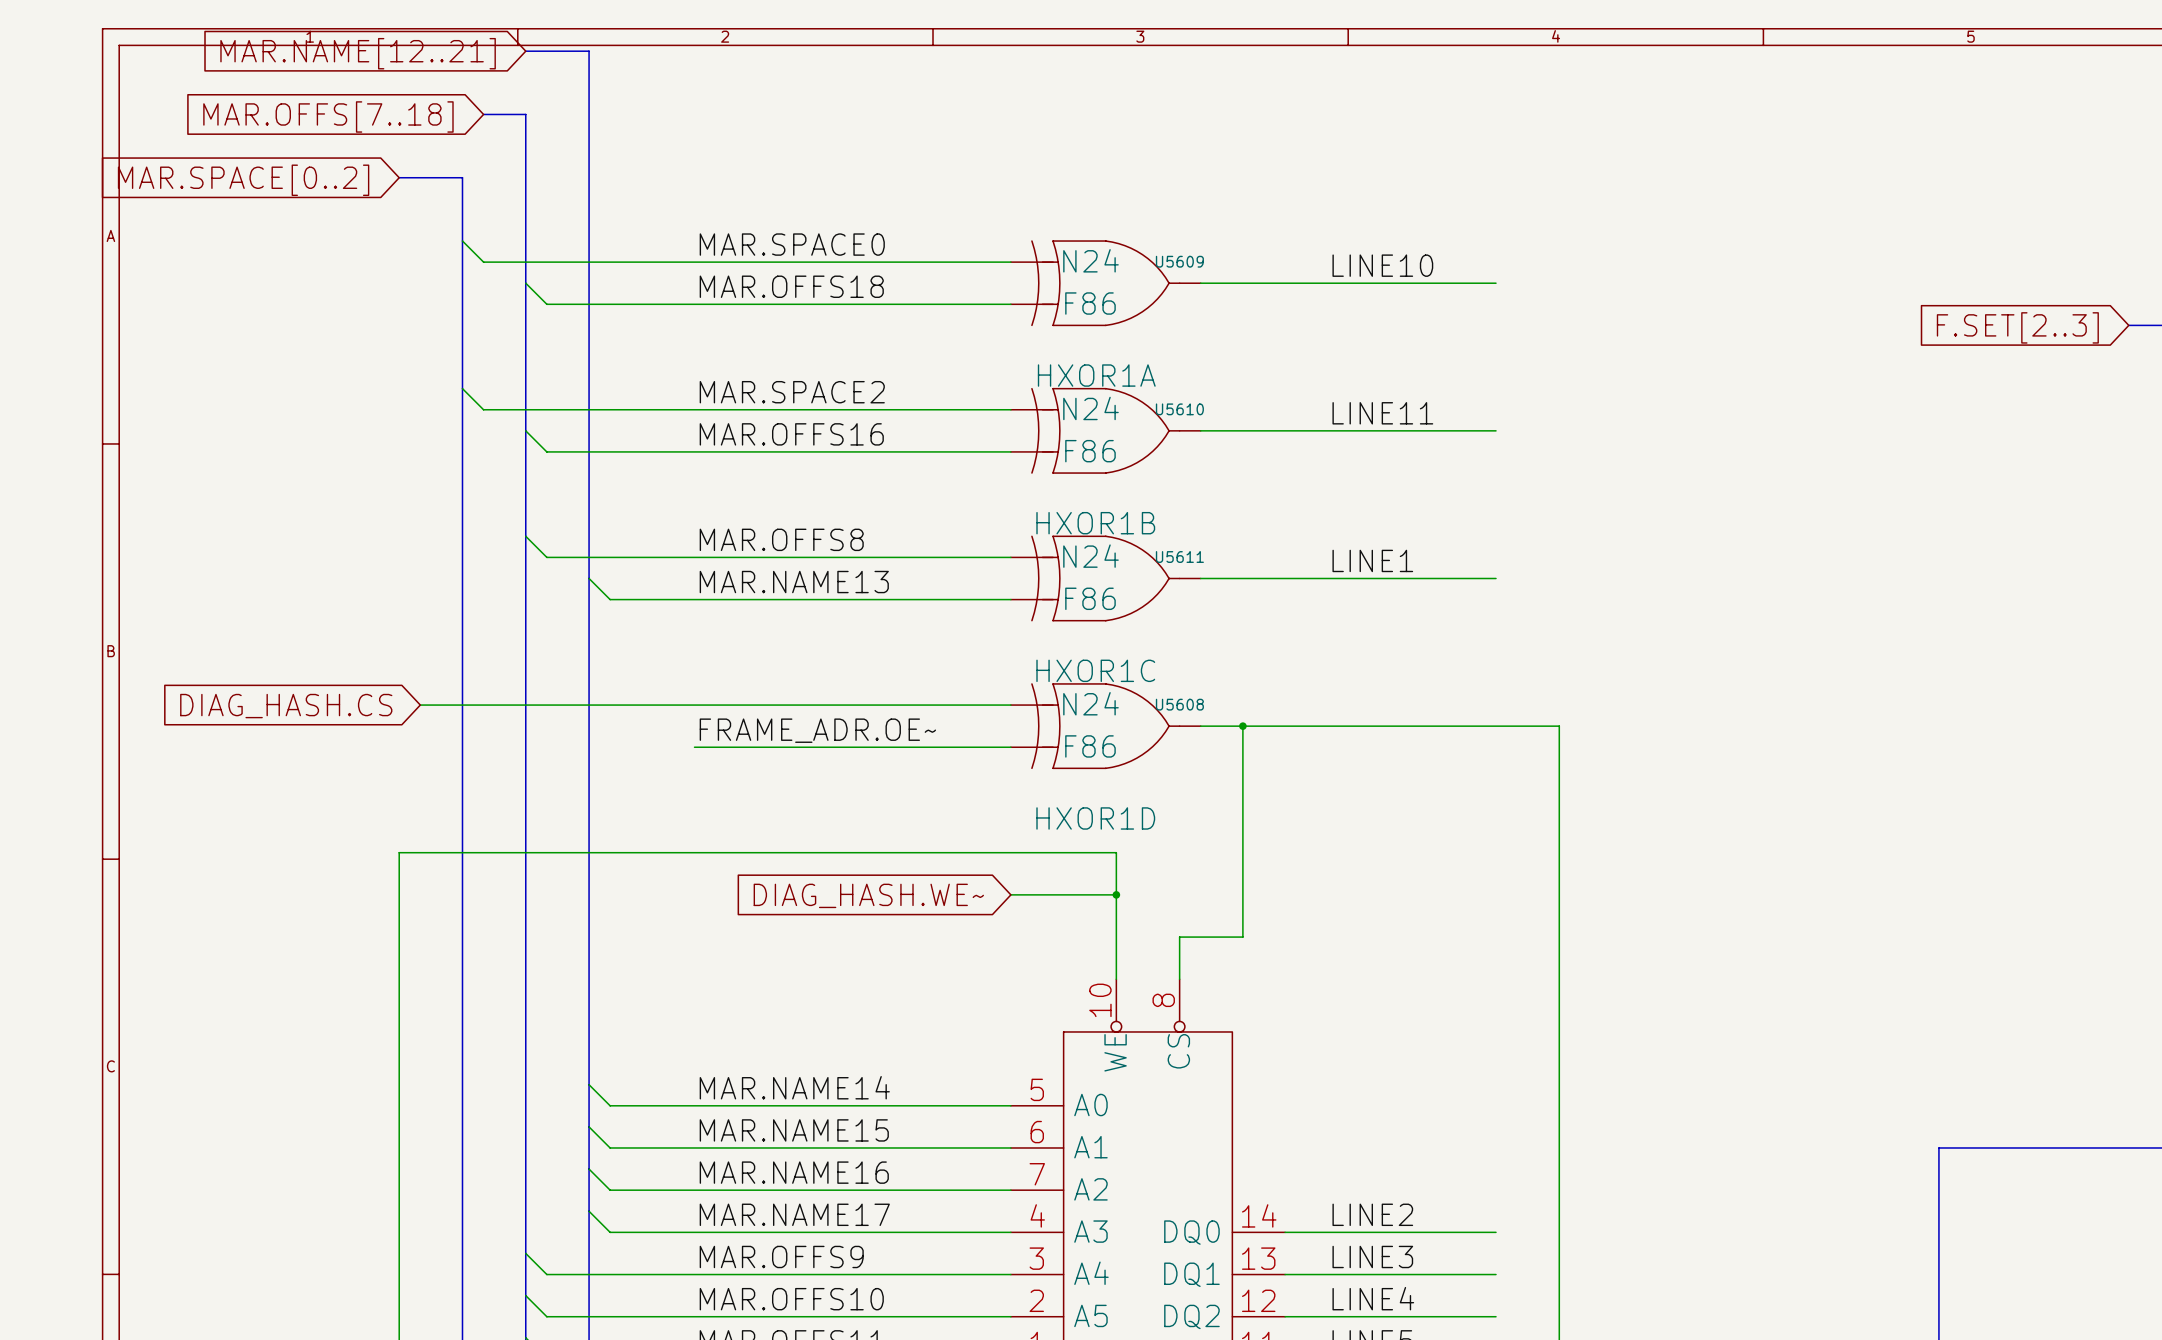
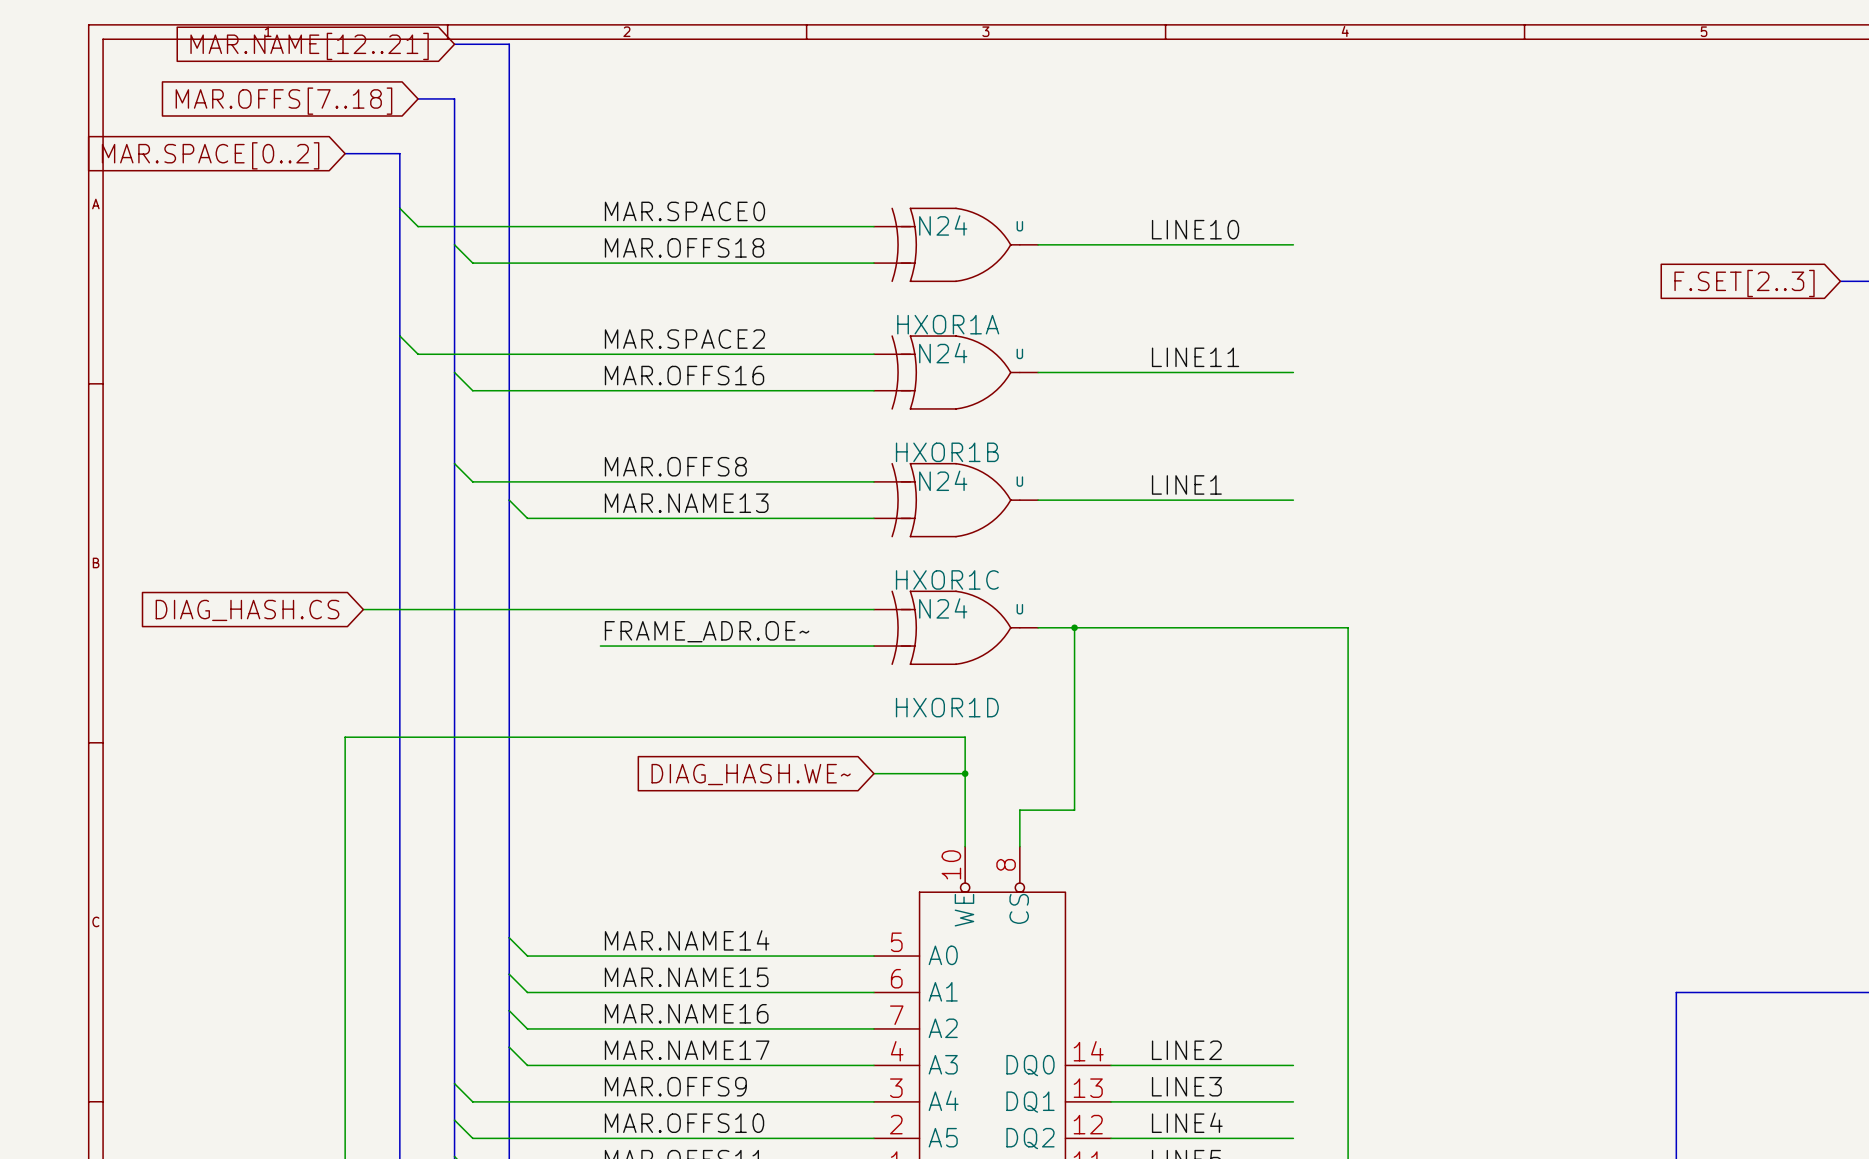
U5609 name: U5609 (1179, 261) -> U (1019, 226)
U5609 value: F86 (1090, 303) -> none
U5610 name: U5610 (1179, 409) -> U (1019, 353)
U5610 value: F86 (1090, 451) -> none
U5611 name: U5611 (1179, 557) -> U (1019, 481)
U5611 value: F86 (1090, 598) -> none
U5608 name: U5608 (1179, 704) -> U (1019, 609)
U5608 value: F86 (1090, 746) -> none

